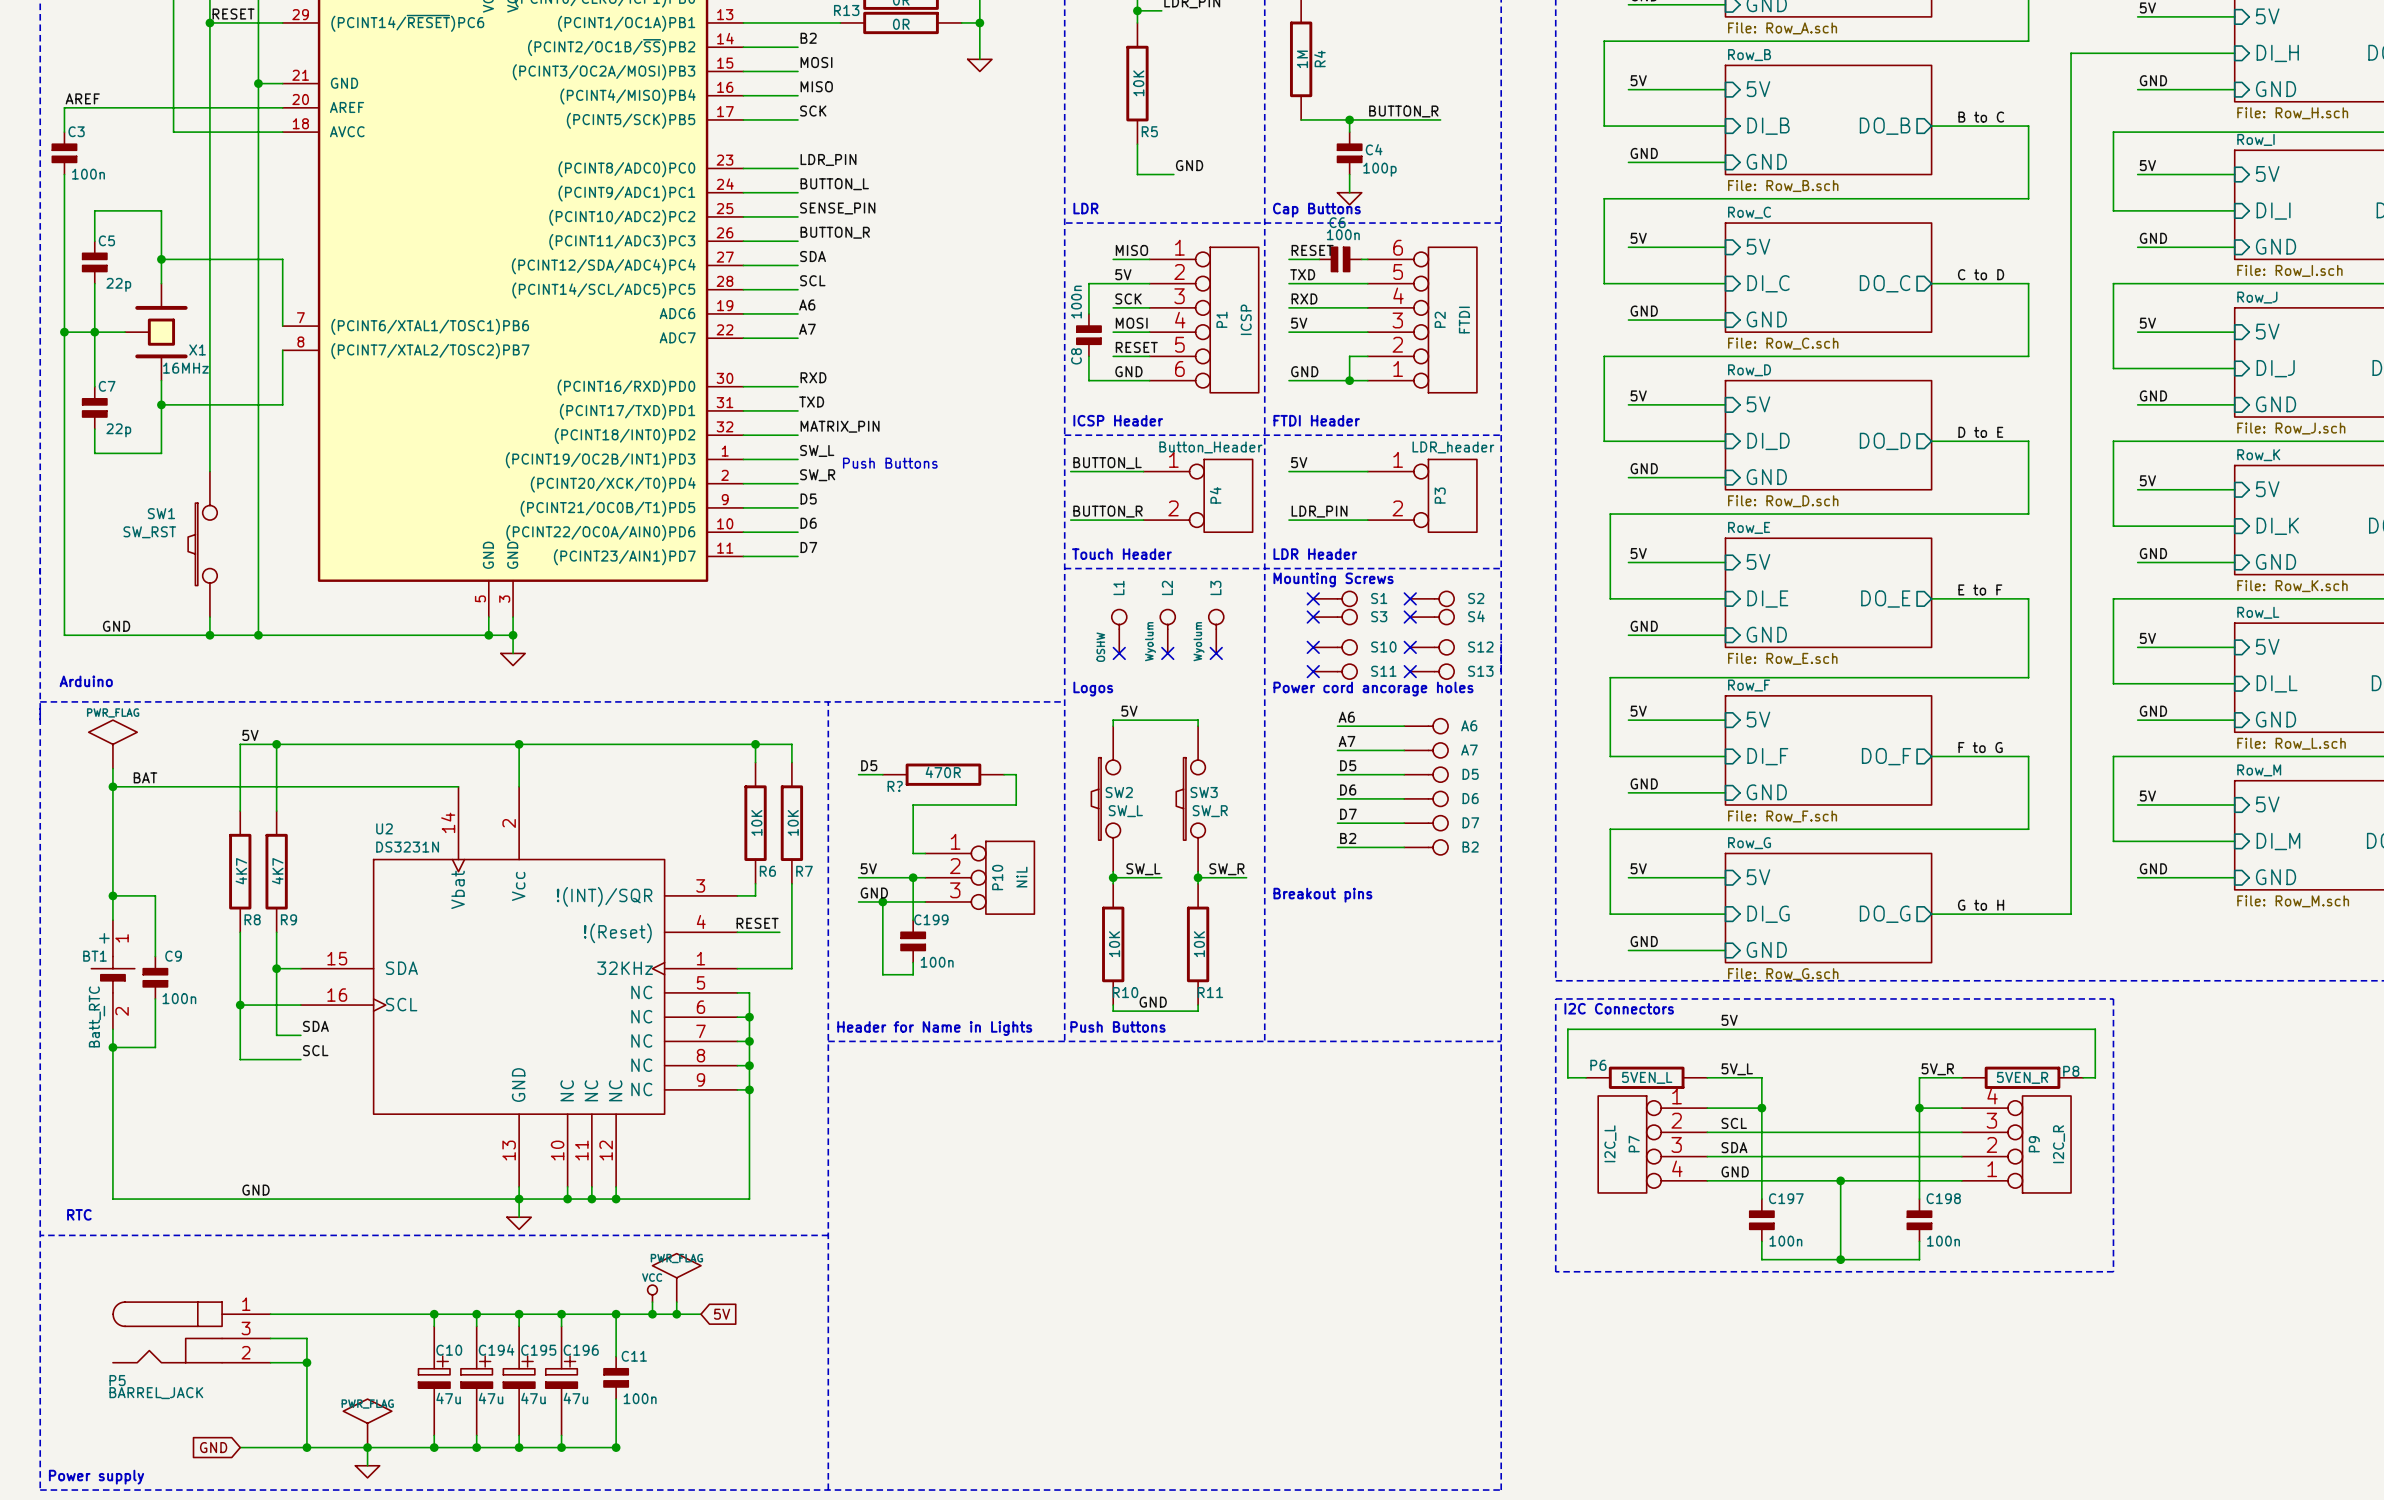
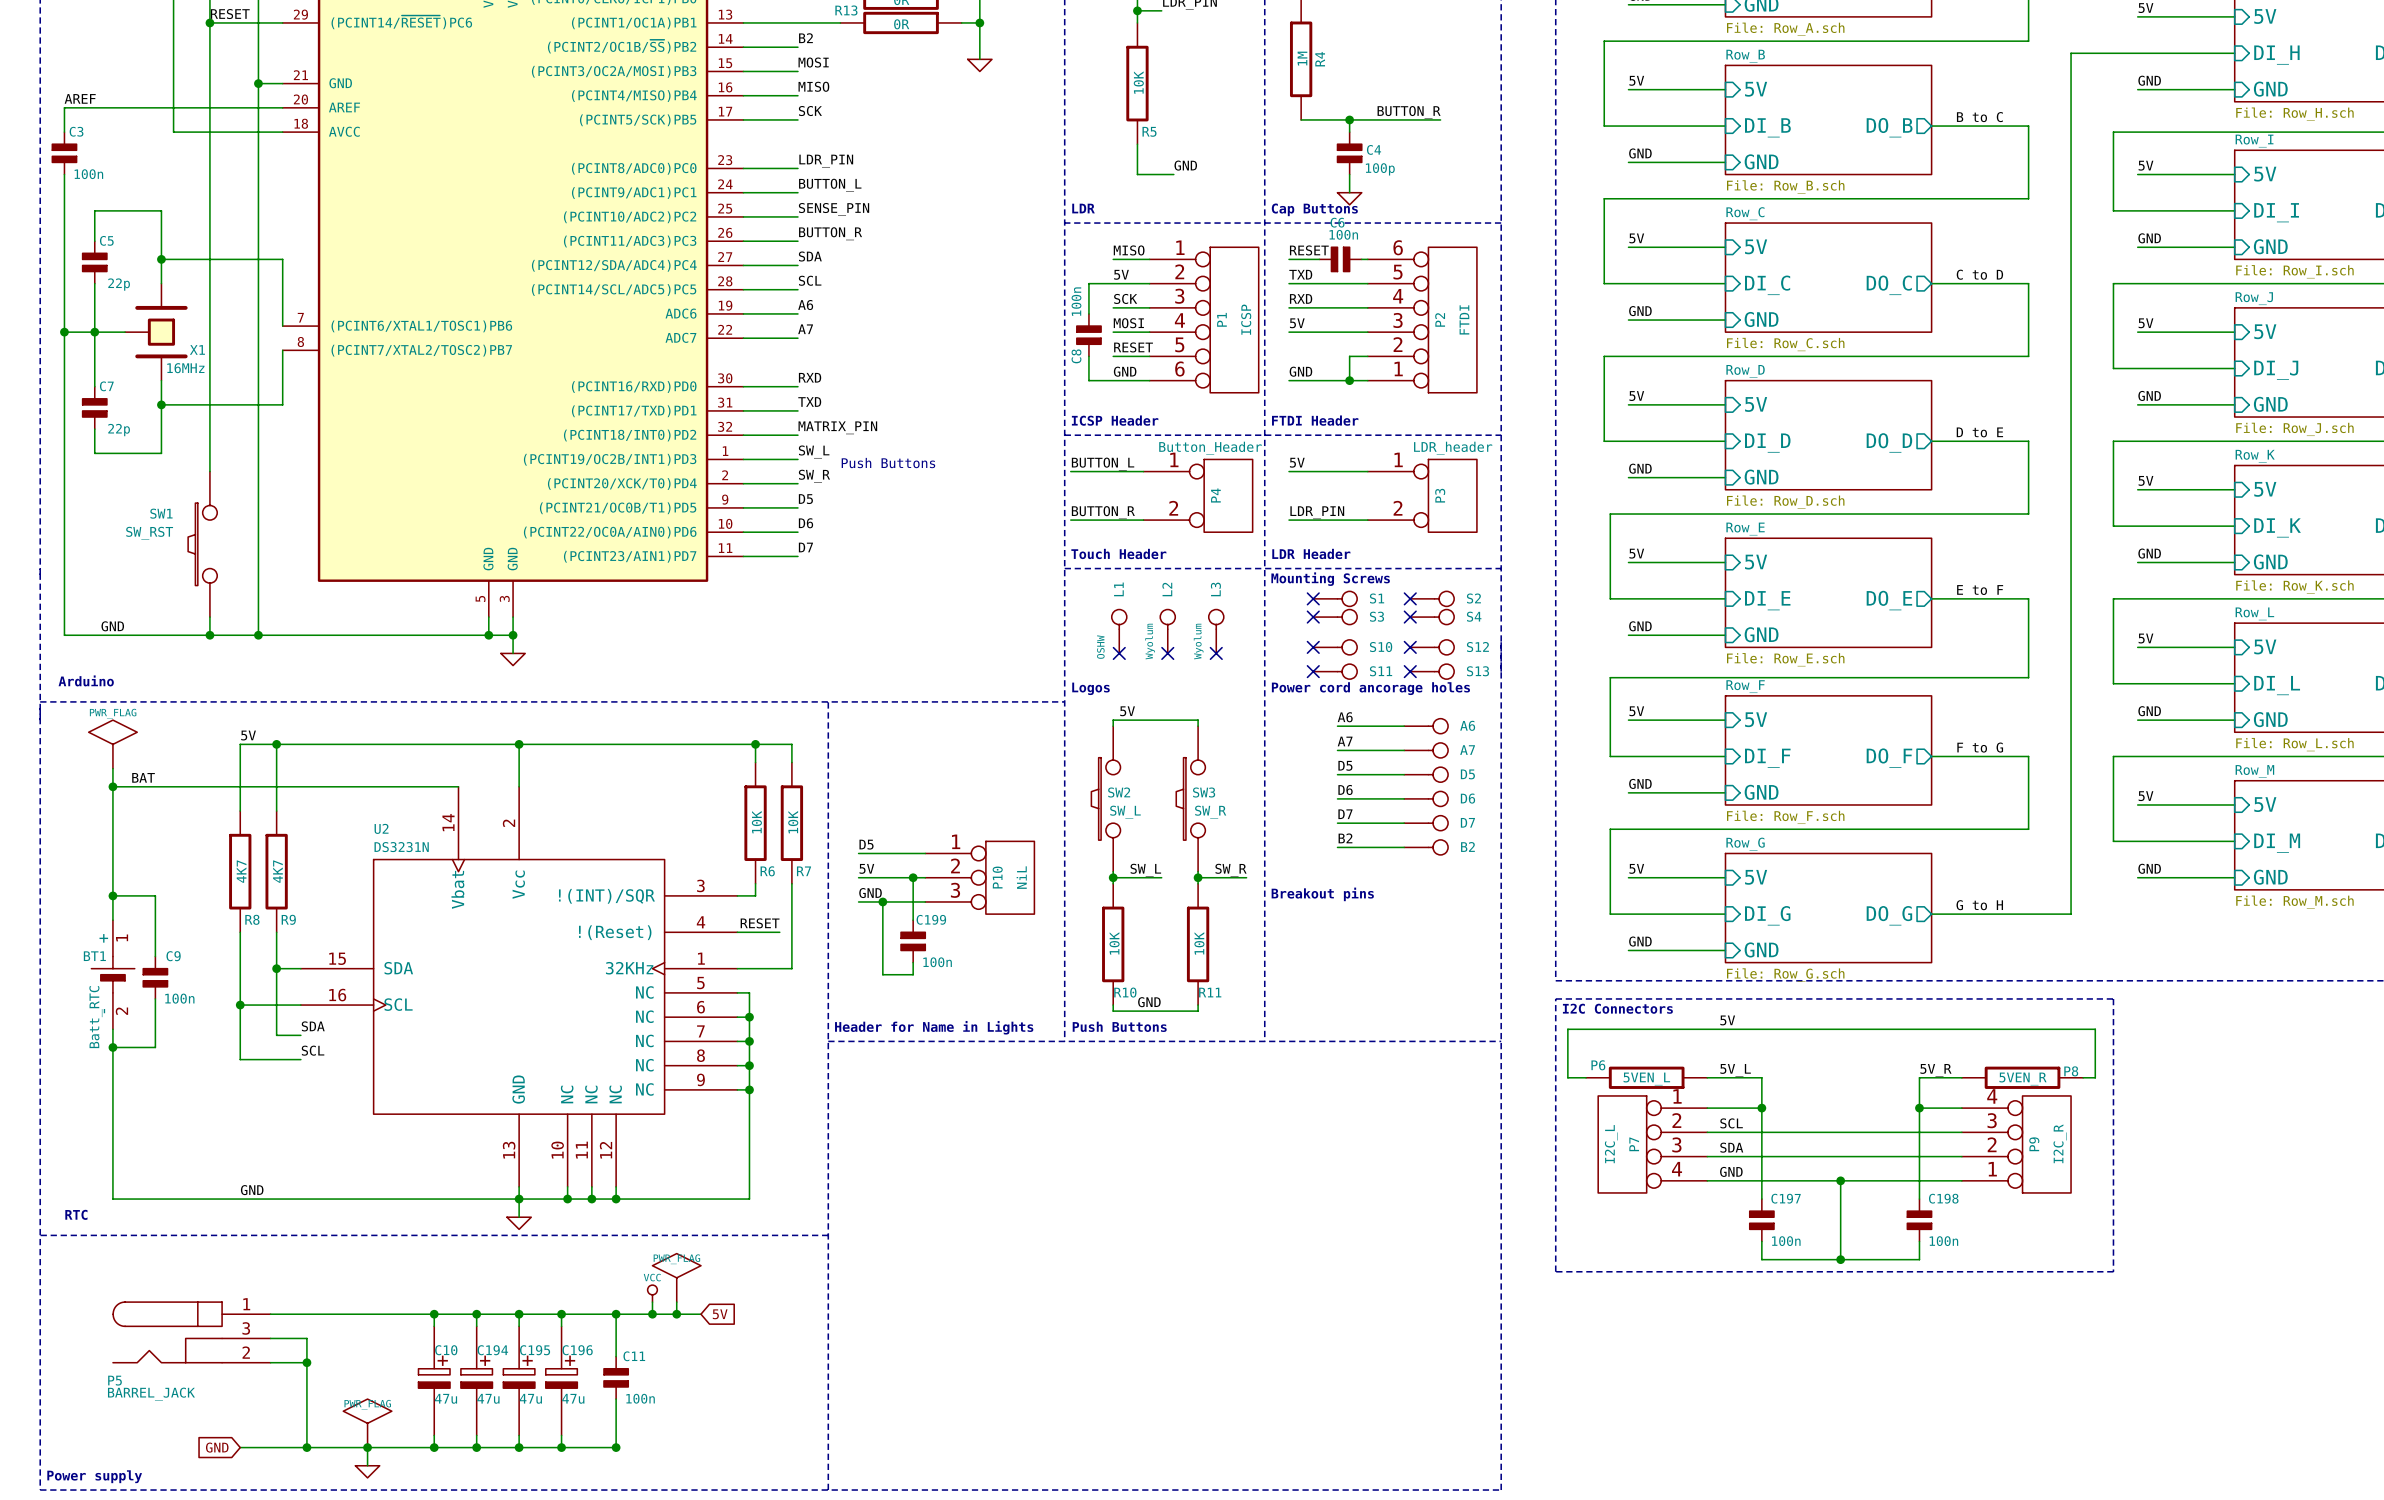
label position: D5 (869, 765) -> D5 (866, 844)
wire: (858, 774) (882, 774) -> none
R?: 470R (943, 774) -> none
wire: (1004, 774) (1016, 774) (1016, 804) (913, 804) (913, 853) -> (858, 853) (913, 853)

